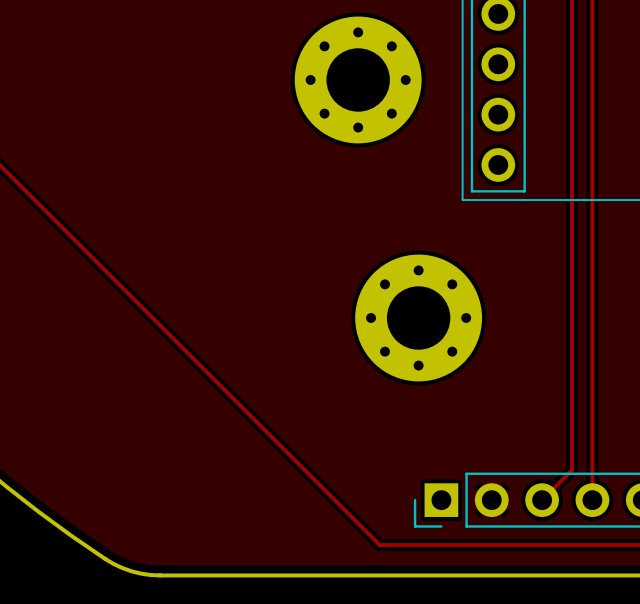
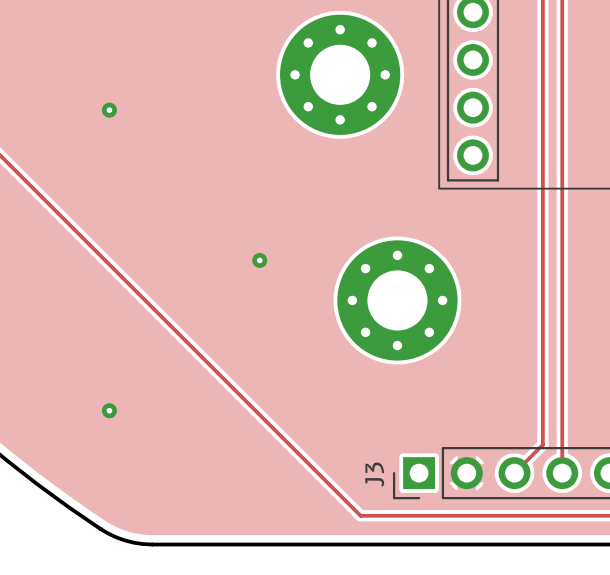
via: none -> (109, 110)
via: none -> (259, 260)
via: none -> (109, 410)
J3 name: none -> J3 (374, 474)

